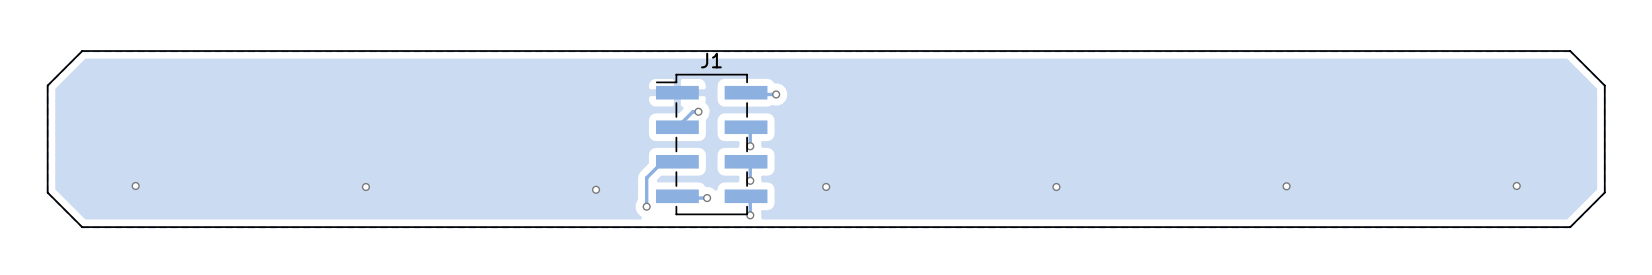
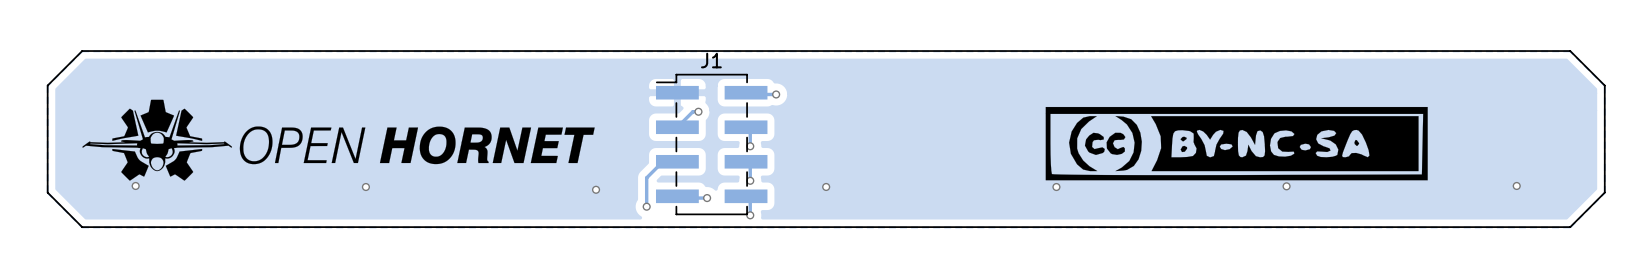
drawing: none -> [82, 99, 595, 181]
drawing: none -> [1045, 106, 1428, 181]

